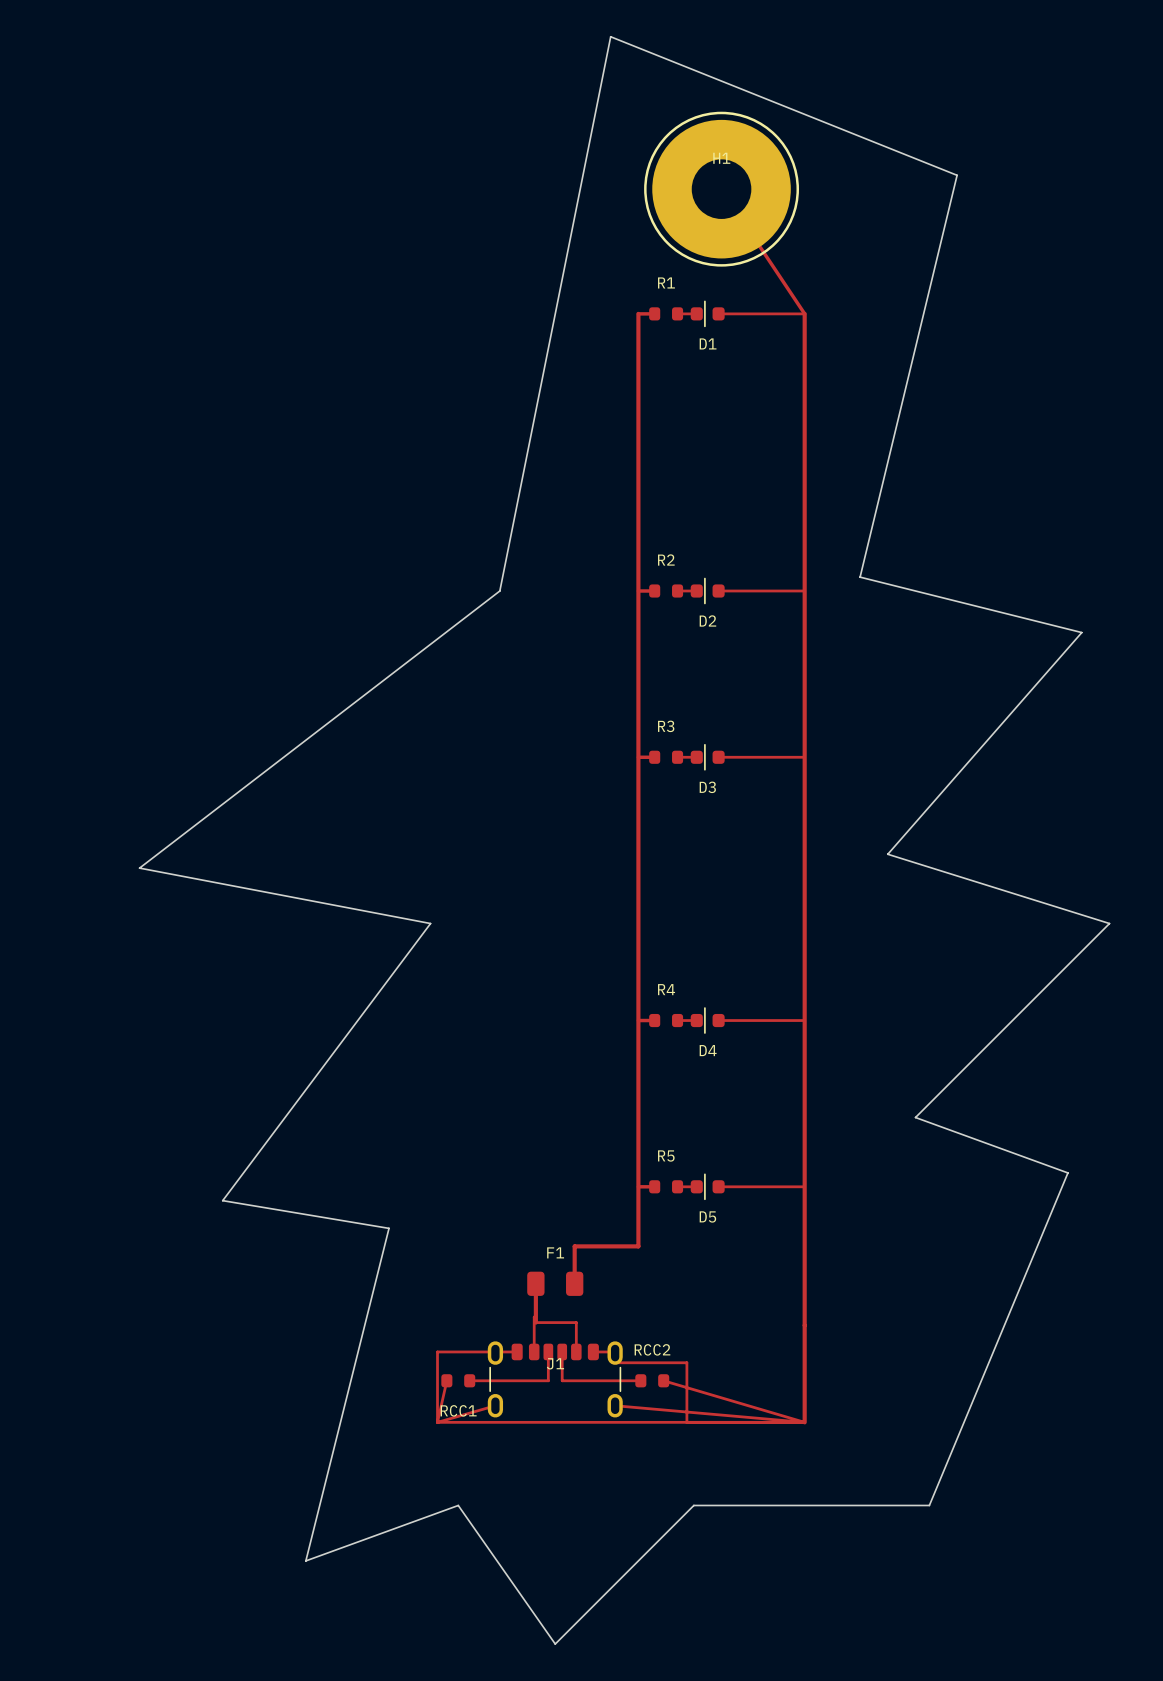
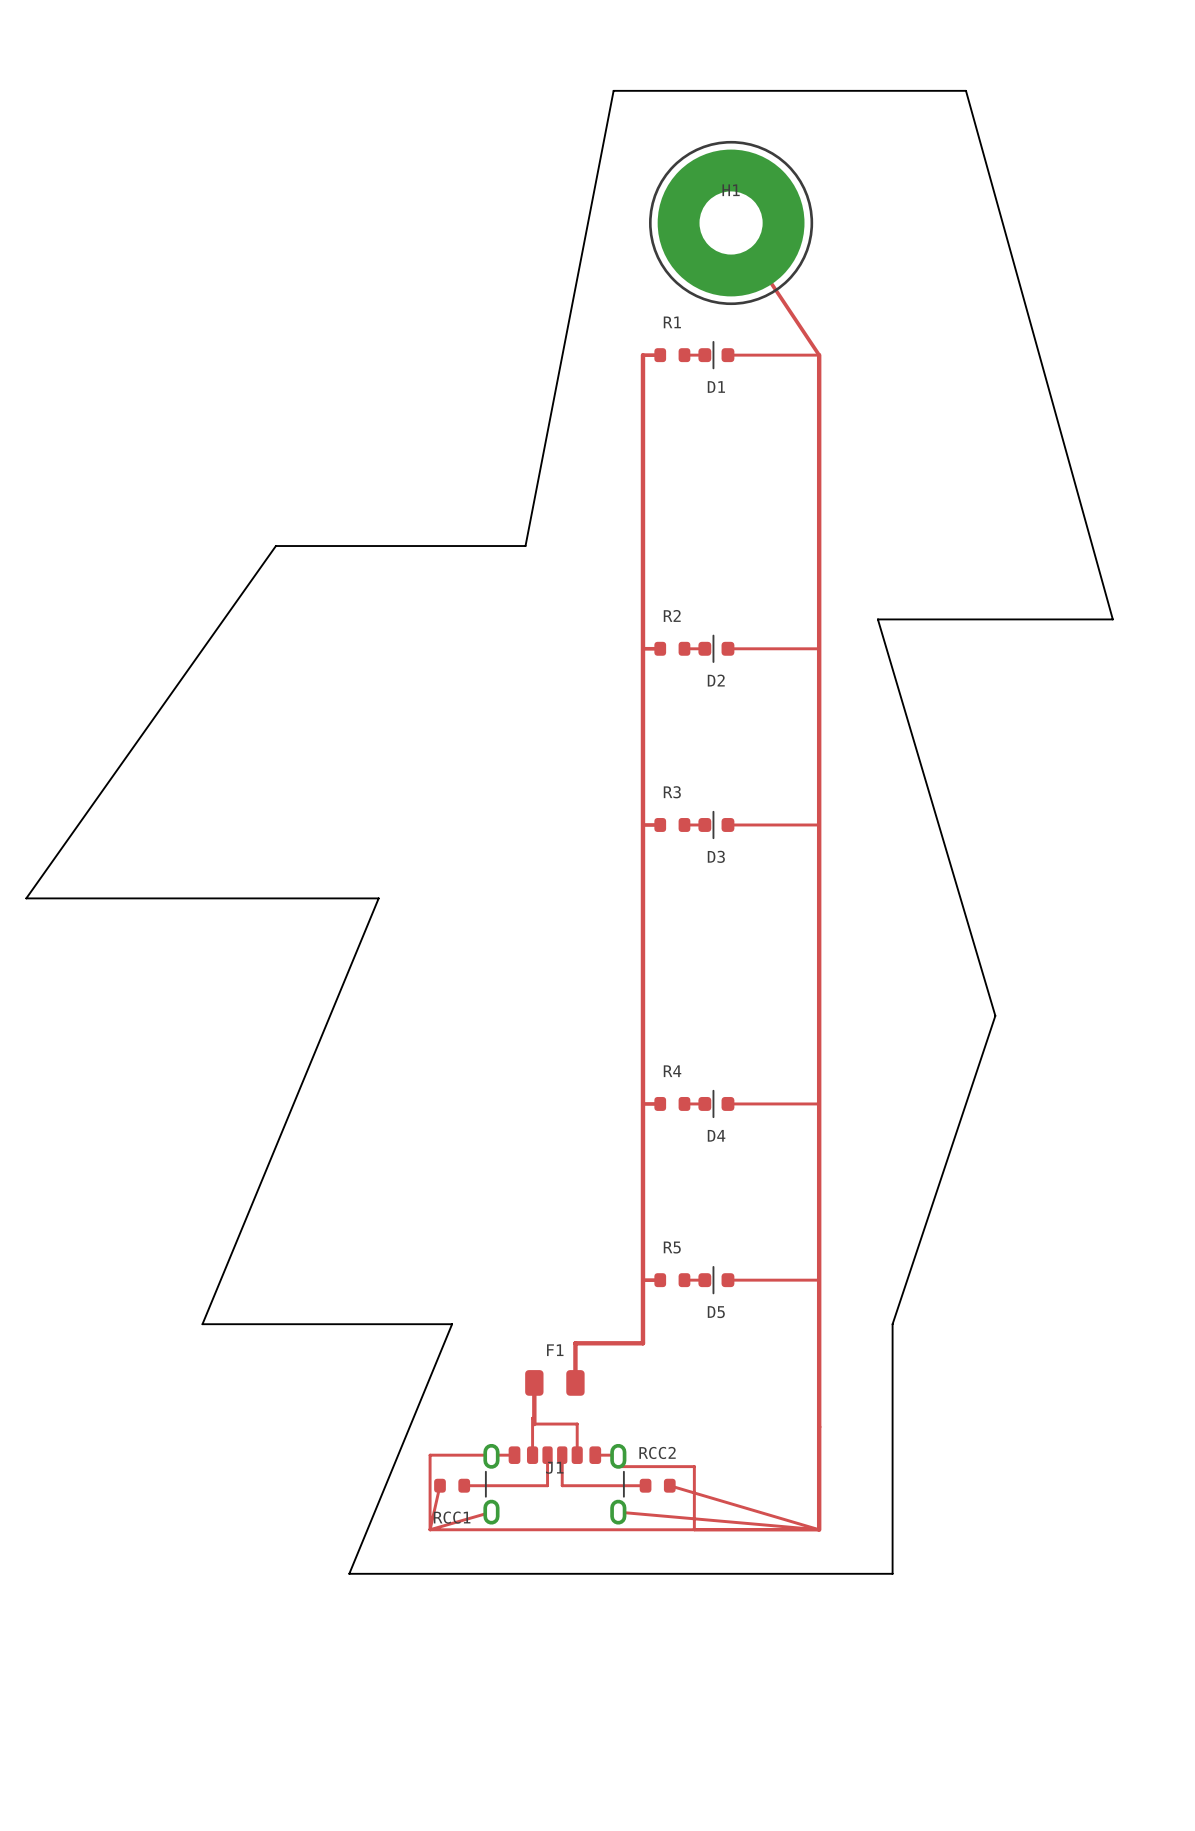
board edge: (610, 36) (957, 175) (860, 577) (1081, 632) (887, 854) (1109, 923) (915, 1117) (1067, 1172) (929, 1505) (693, 1505) (555, 1644) (458, 1505) (305, 1560) (389, 1228) (222, 1200) (430, 923) (139, 868) (499, 591) (610, 36) -> (613, 90) (525, 546) (275, 546) (26, 898) (378, 898) (202, 1324) (452, 1324) (349, 1573) (892, 1573) (892, 1324) (995, 1015) (877, 619) (1112, 619) (966, 90) (613, 90)

